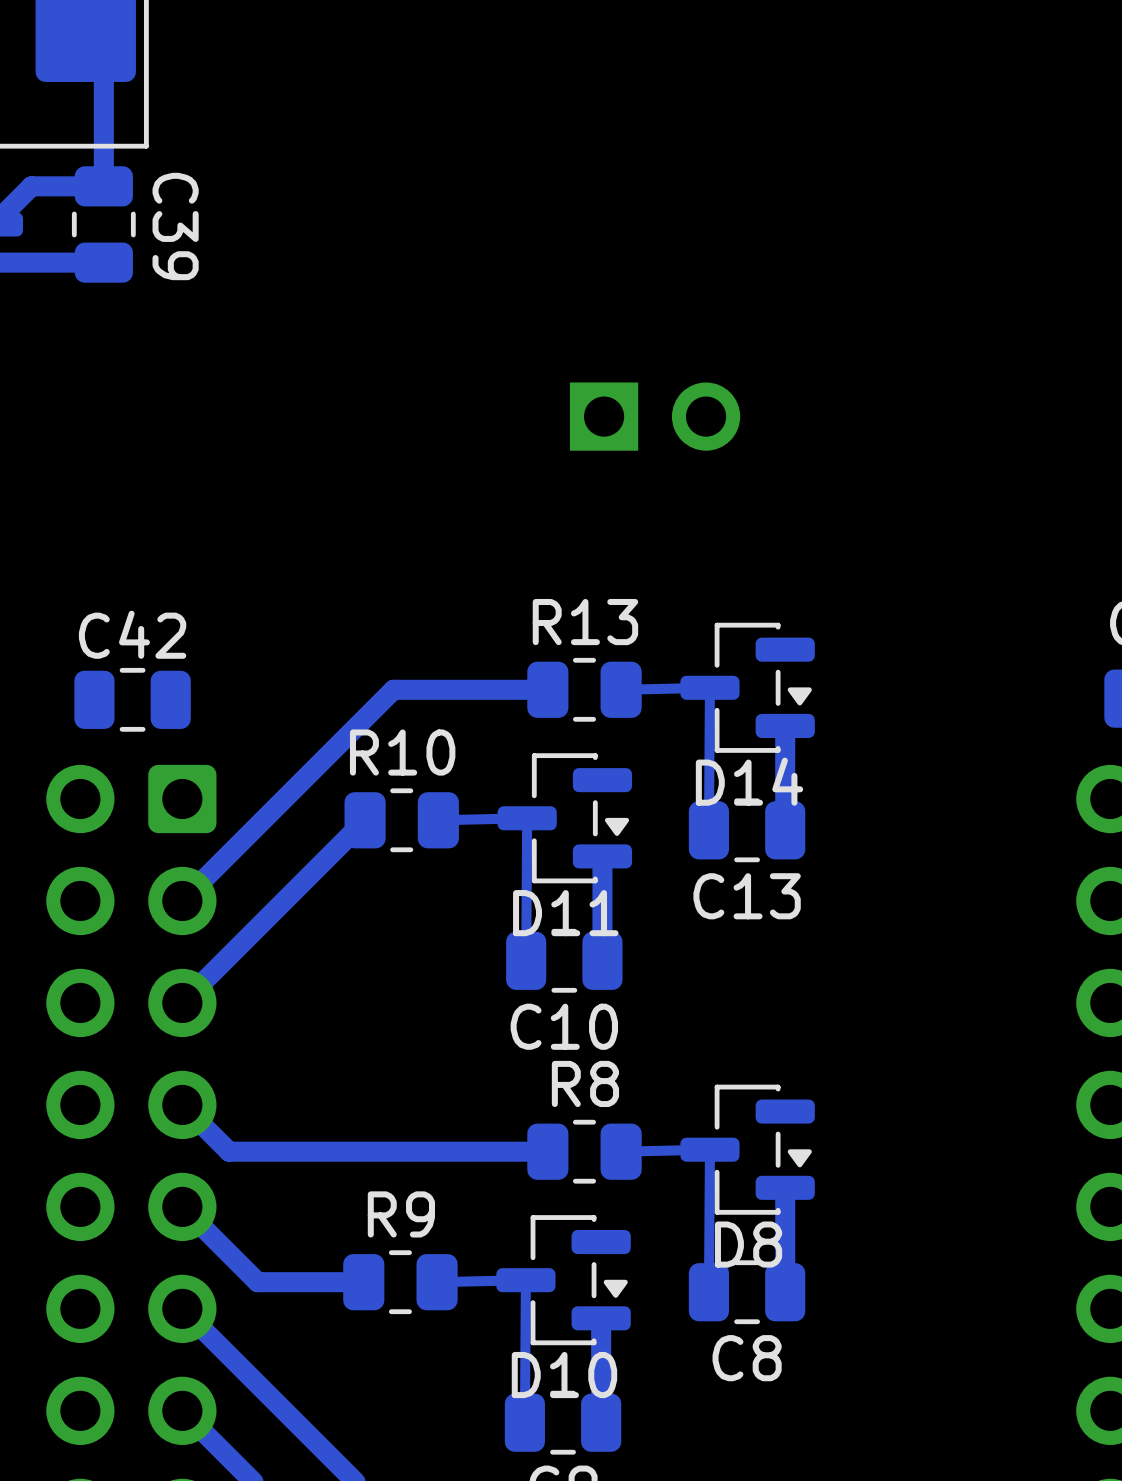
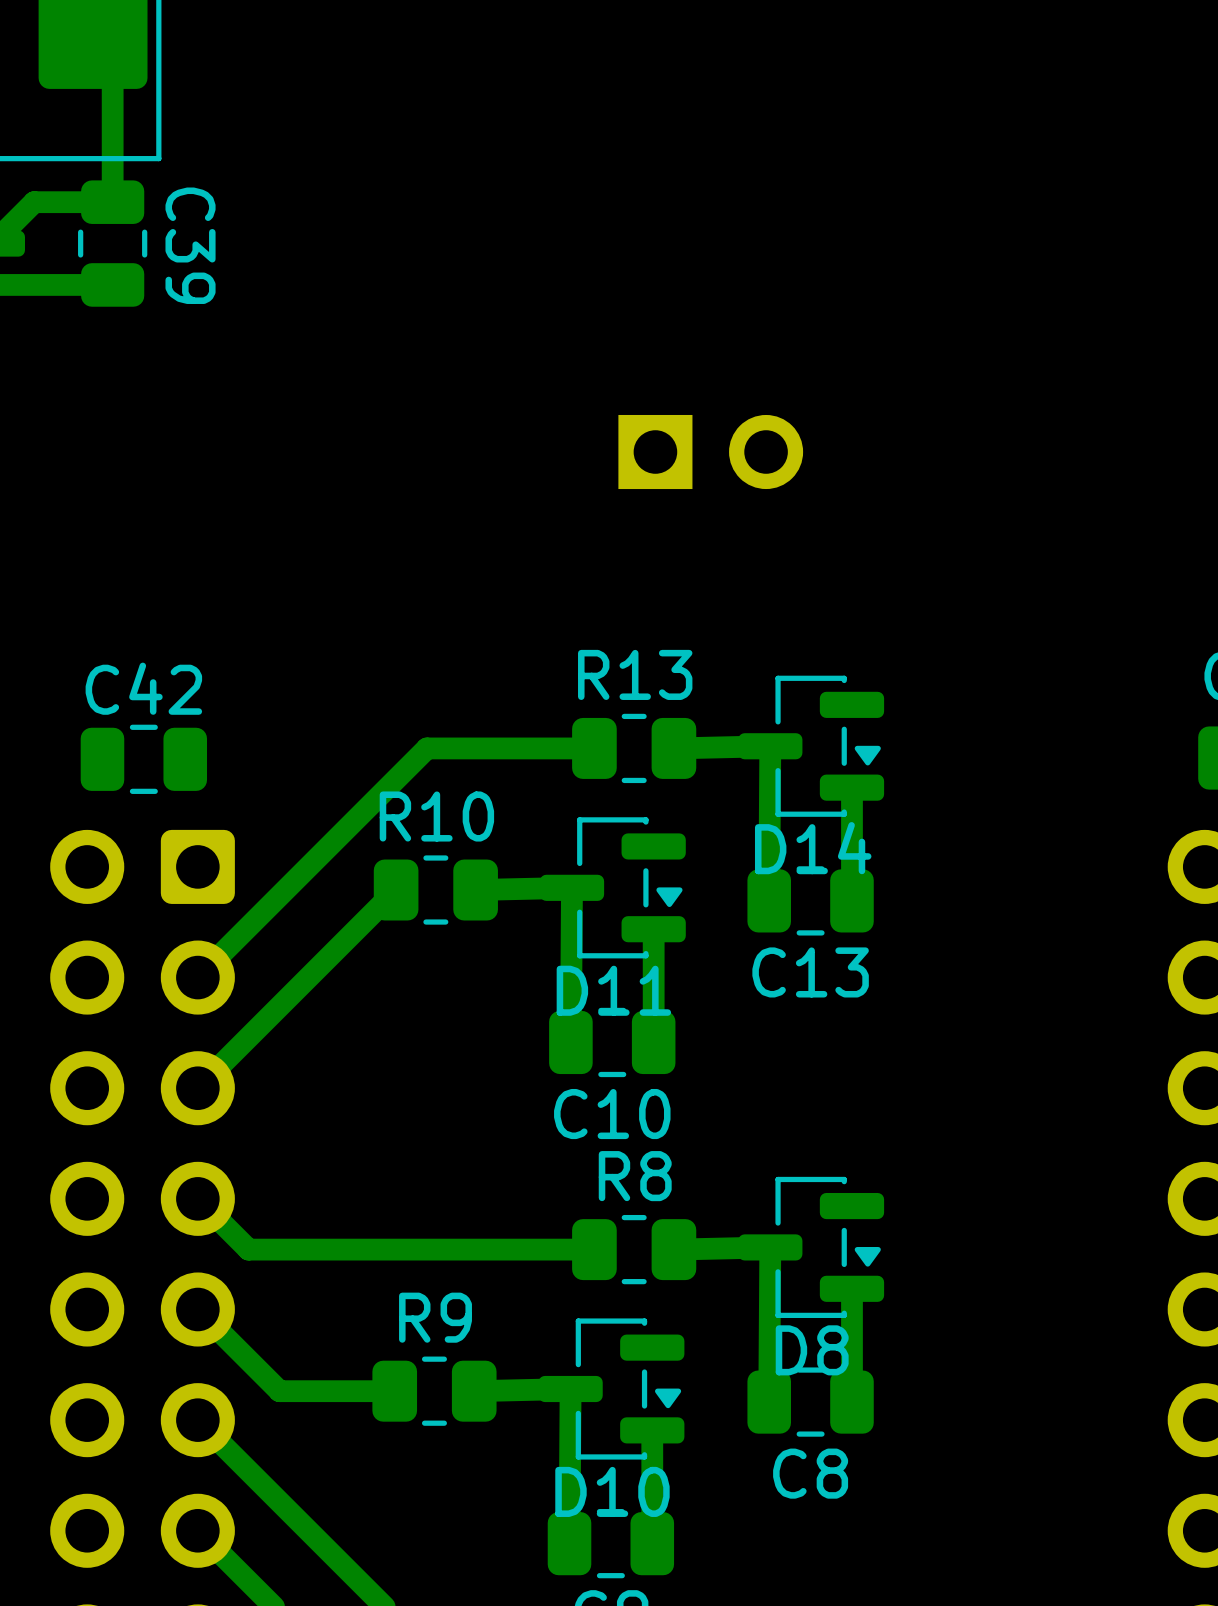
track width: thin (621, 689) (709, 687) (708, 830) -> thick (673, 748) (770, 746) (769, 900)
track width: thin (438, 820) (527, 818) (526, 960) -> thick (475, 890) (571, 887) (570, 1042)
track width: thin (621, 1151) (709, 1149) (708, 1292) -> thick (673, 1249) (770, 1247) (769, 1402)
track width: thin (437, 1282) (525, 1280) (524, 1422) -> thick (474, 1391) (570, 1389) (569, 1543)

